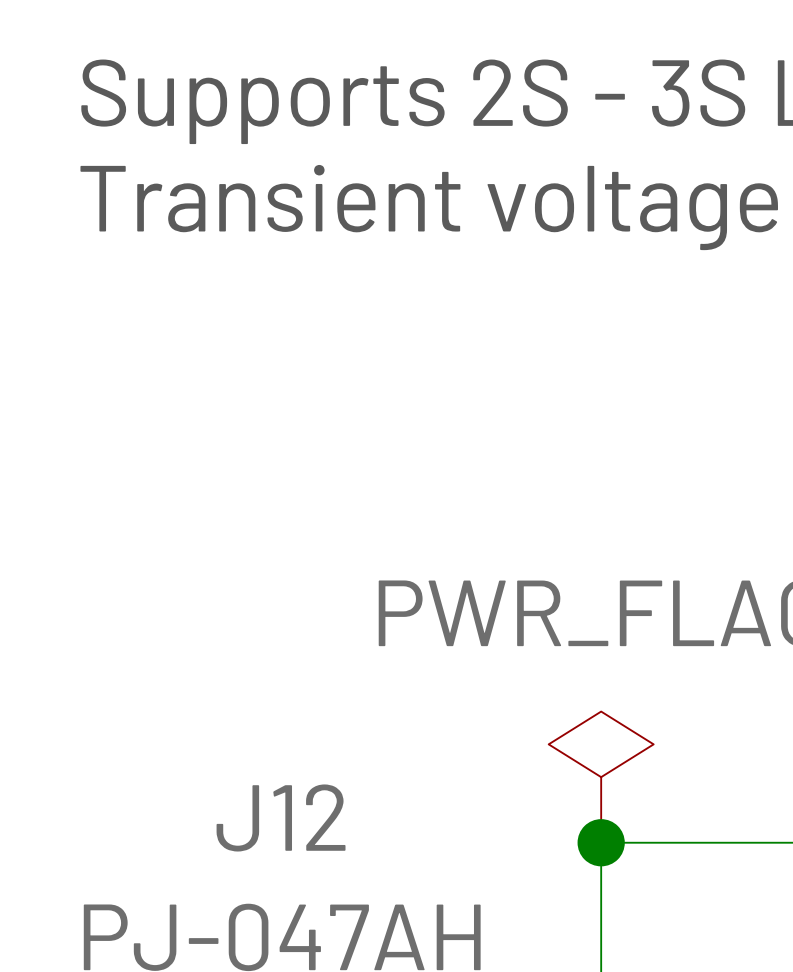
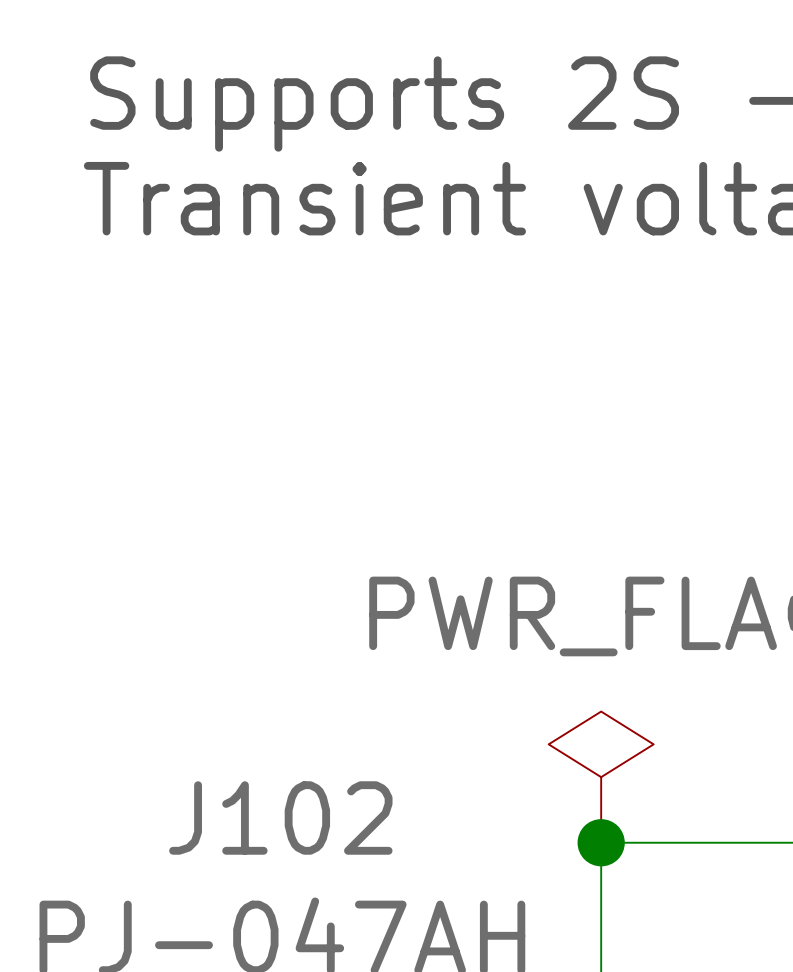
J12 name: J12 (281, 817) -> J102 (280, 817)

